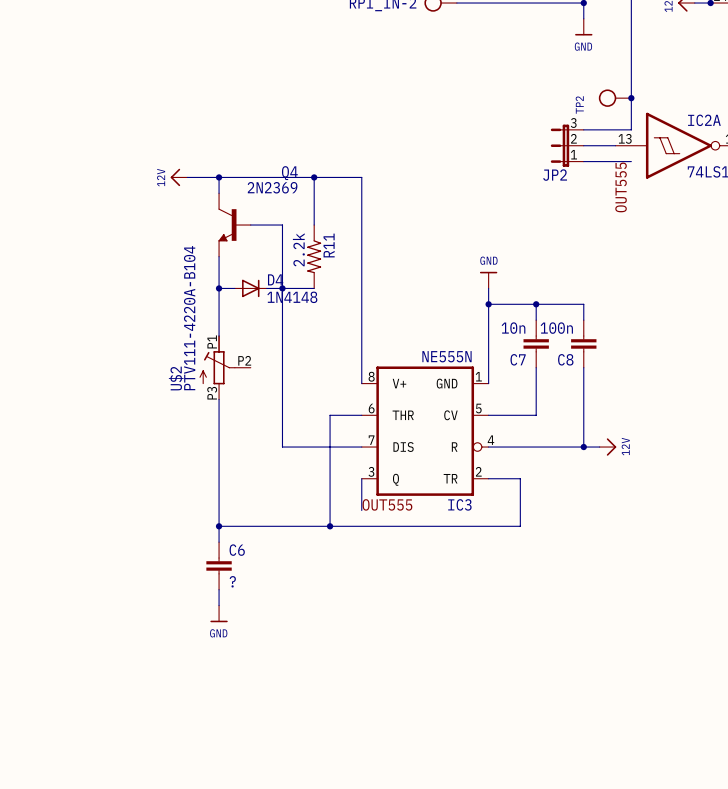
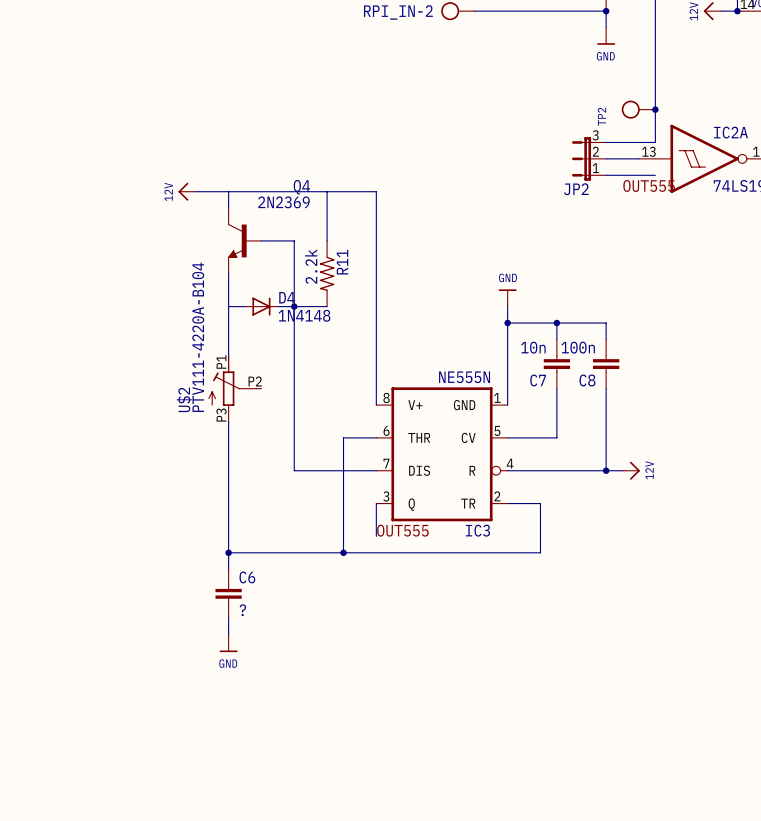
junction: (219, 177) -> none
junction: (314, 177) -> none
label rotation: 0° (621, 187) -> 90° clockwise (649, 185)
junction: (219, 288) -> none

